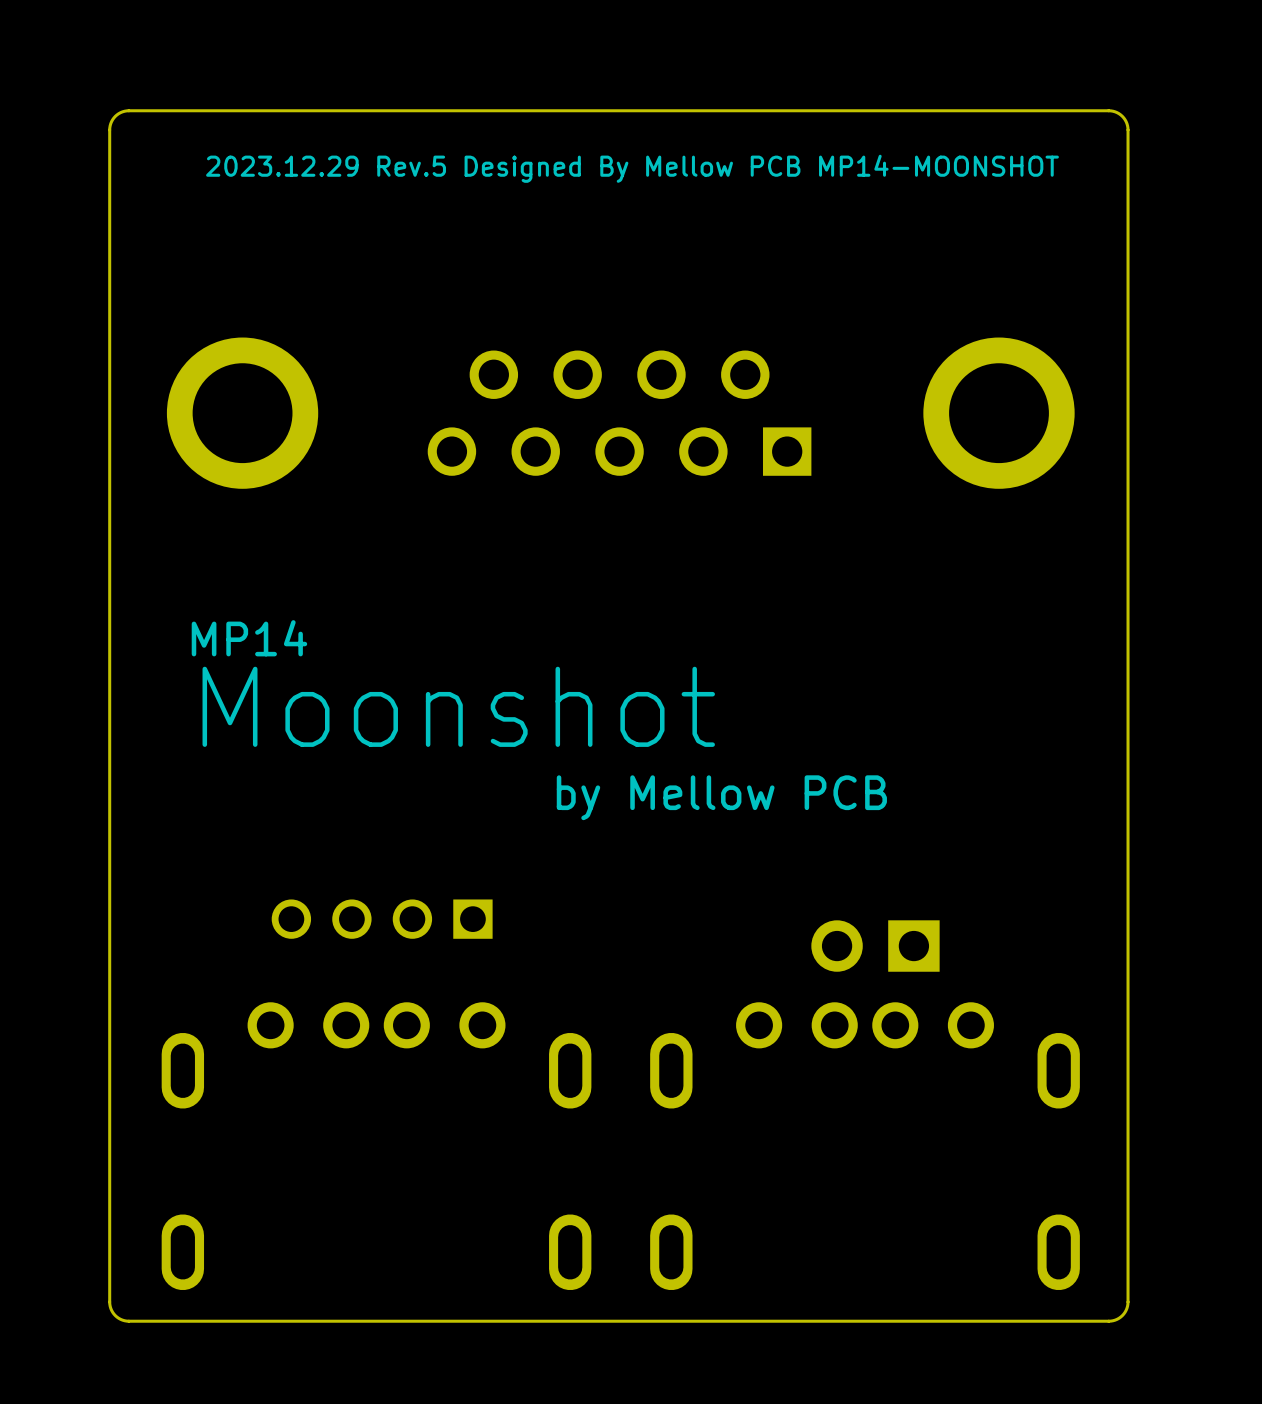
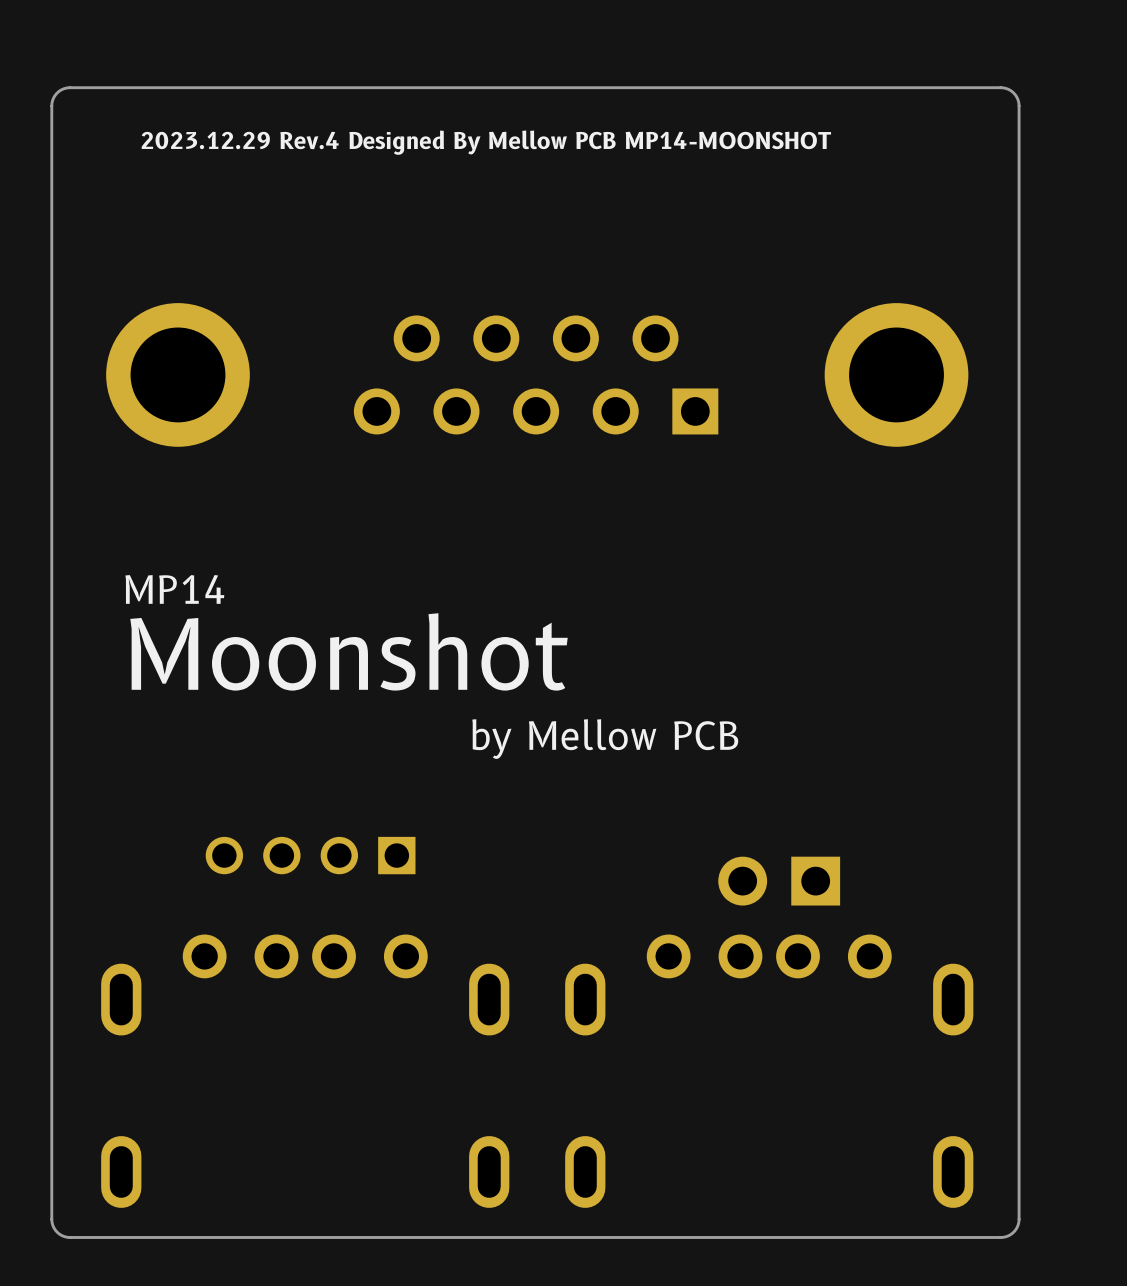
text: 2023.12.29 Rev.5 Designed By Mellow PCB MP14-MOONSHOT (632, 168) -> 2023.12.29 Rev.4 Designed By Mellow PCB MP14-MOONSHOT (486, 142)

